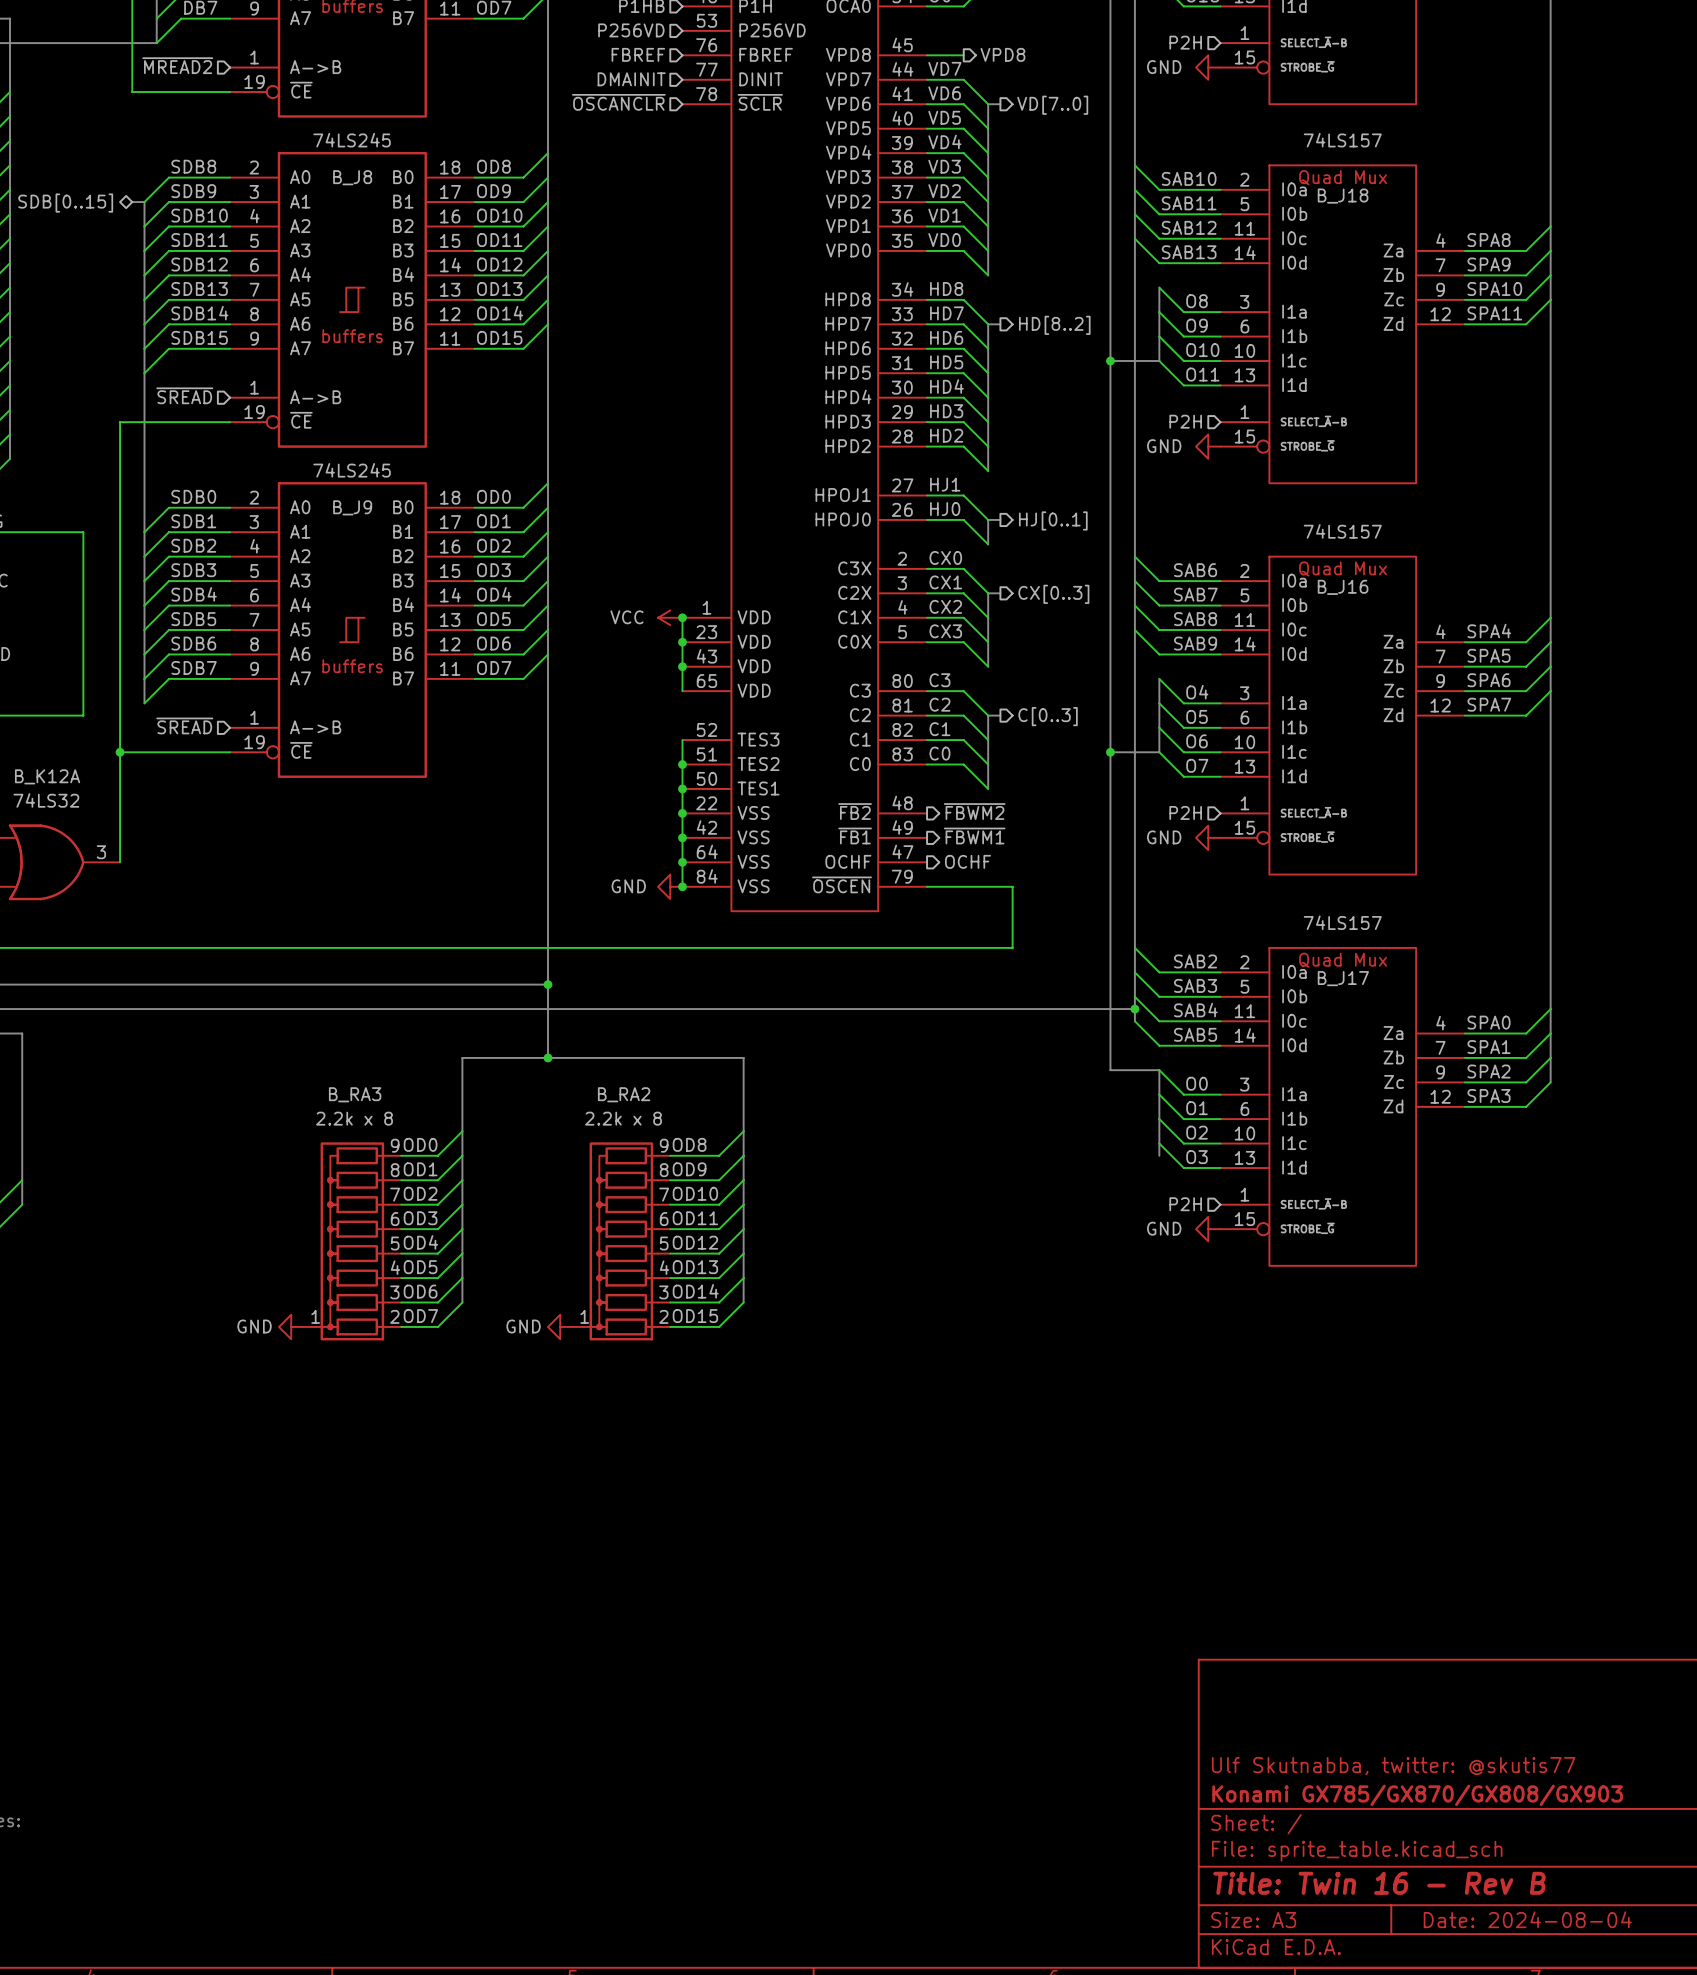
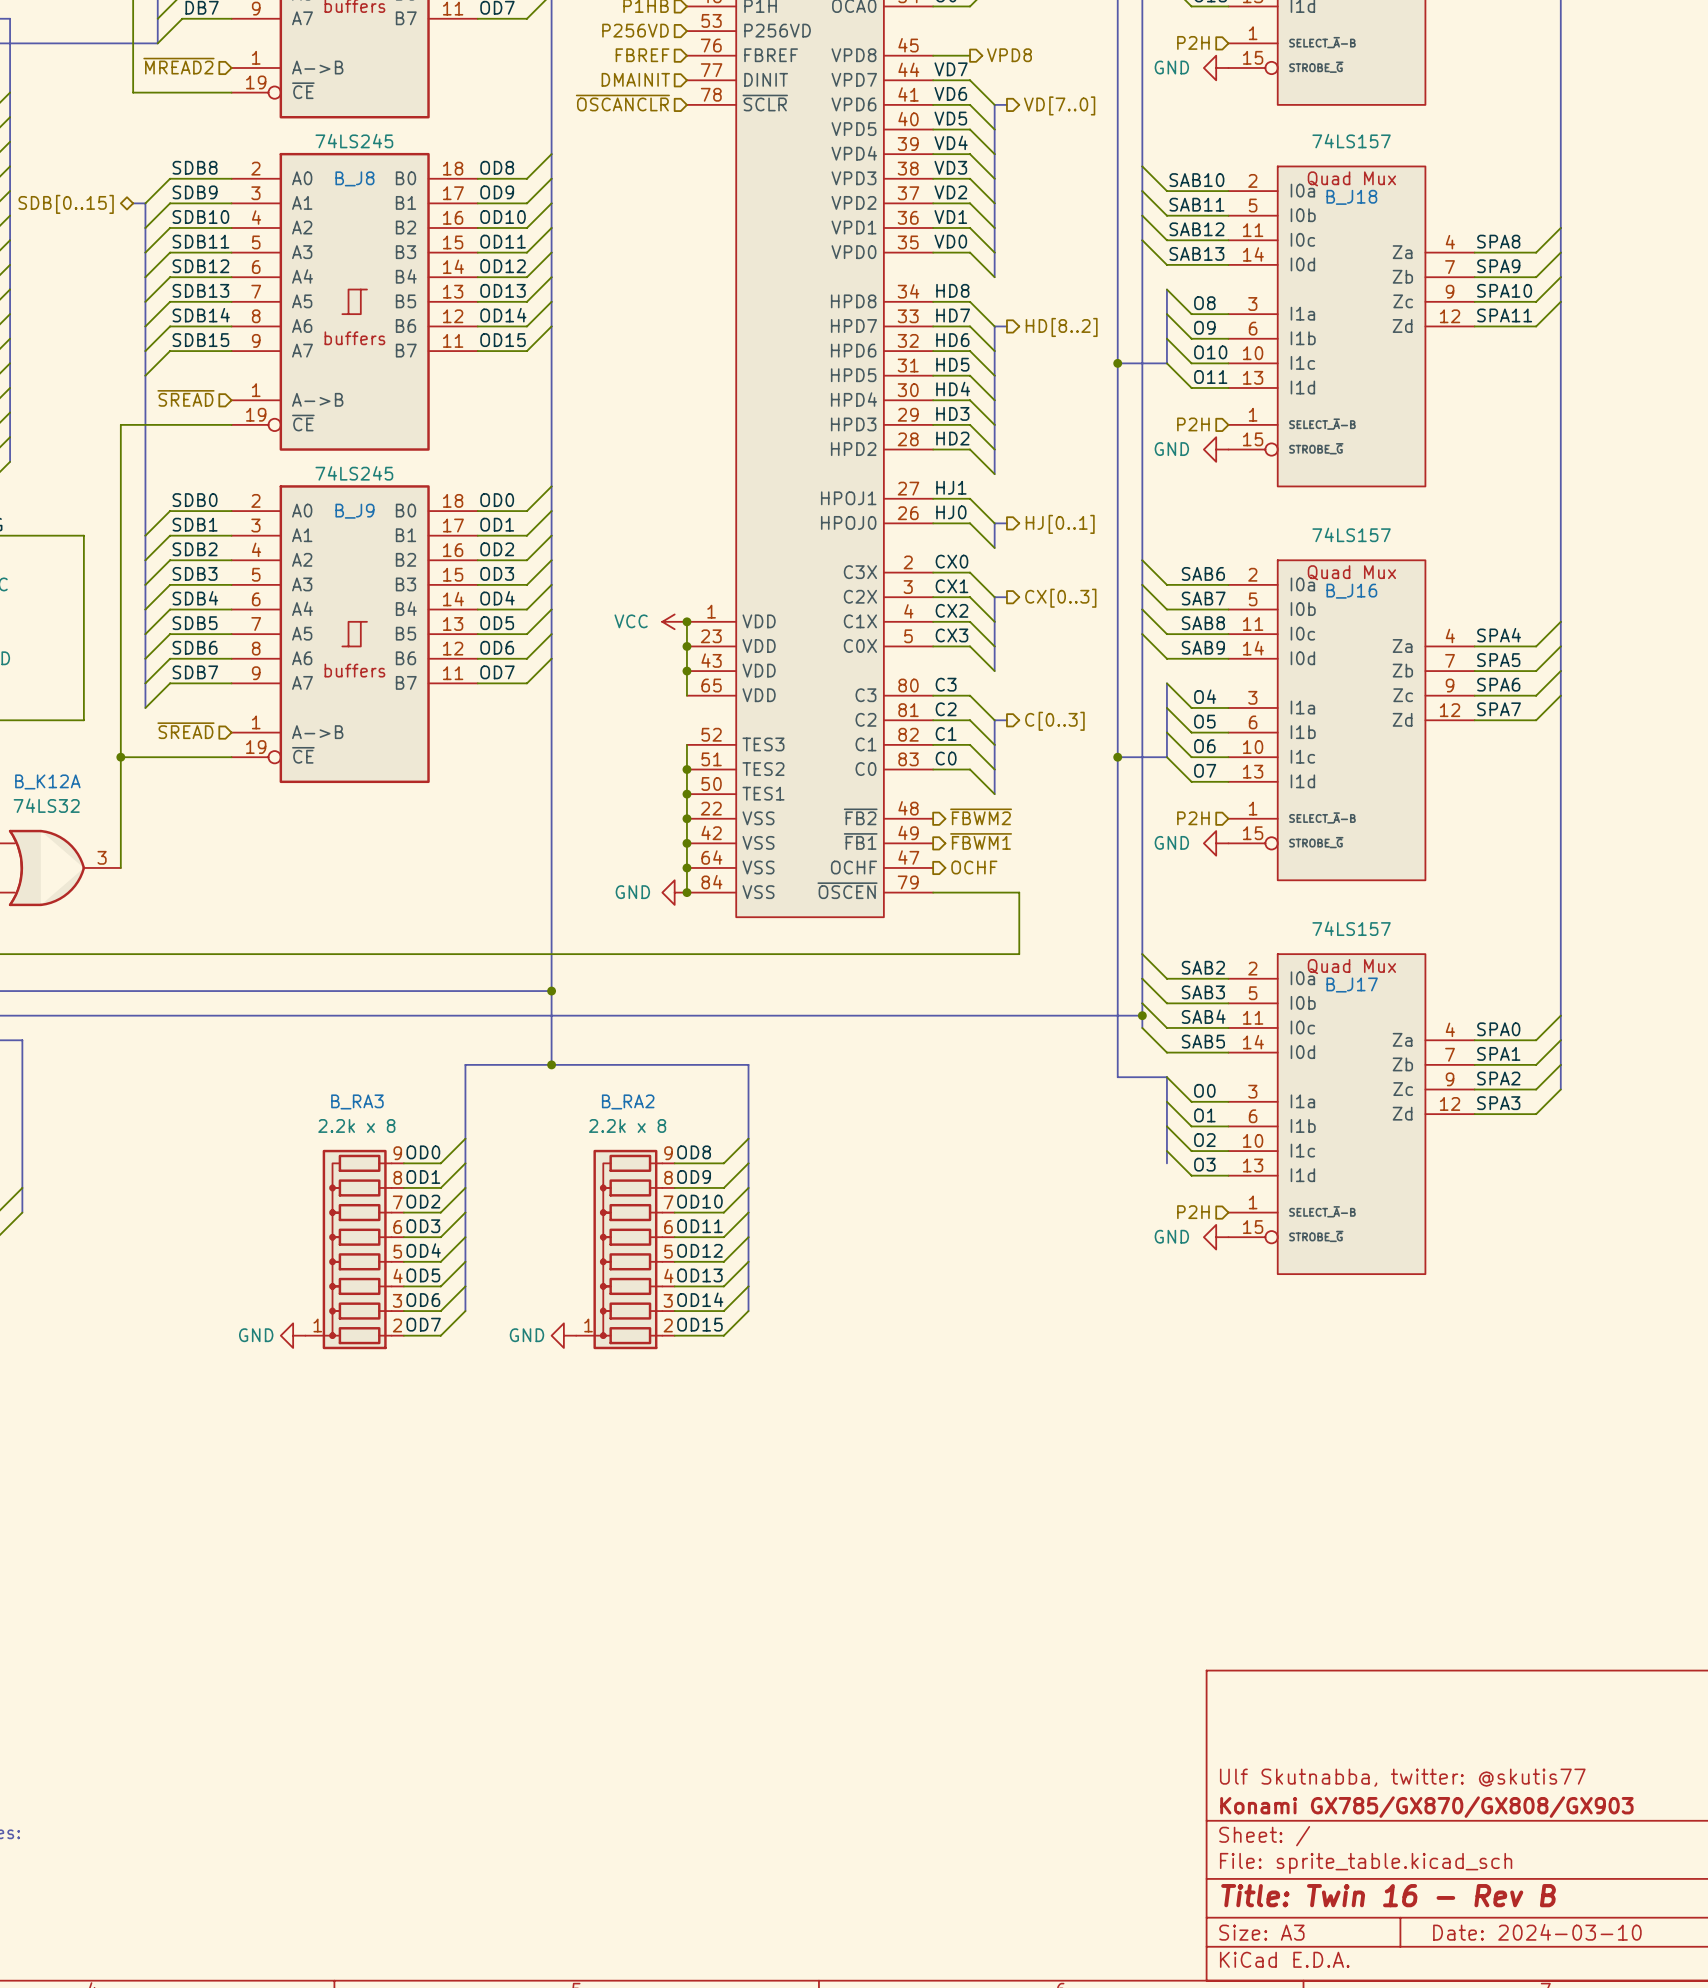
title block: Date: 2024-08-04 (1527, 1919) -> Date: 2024-03-10 (1537, 1932)

